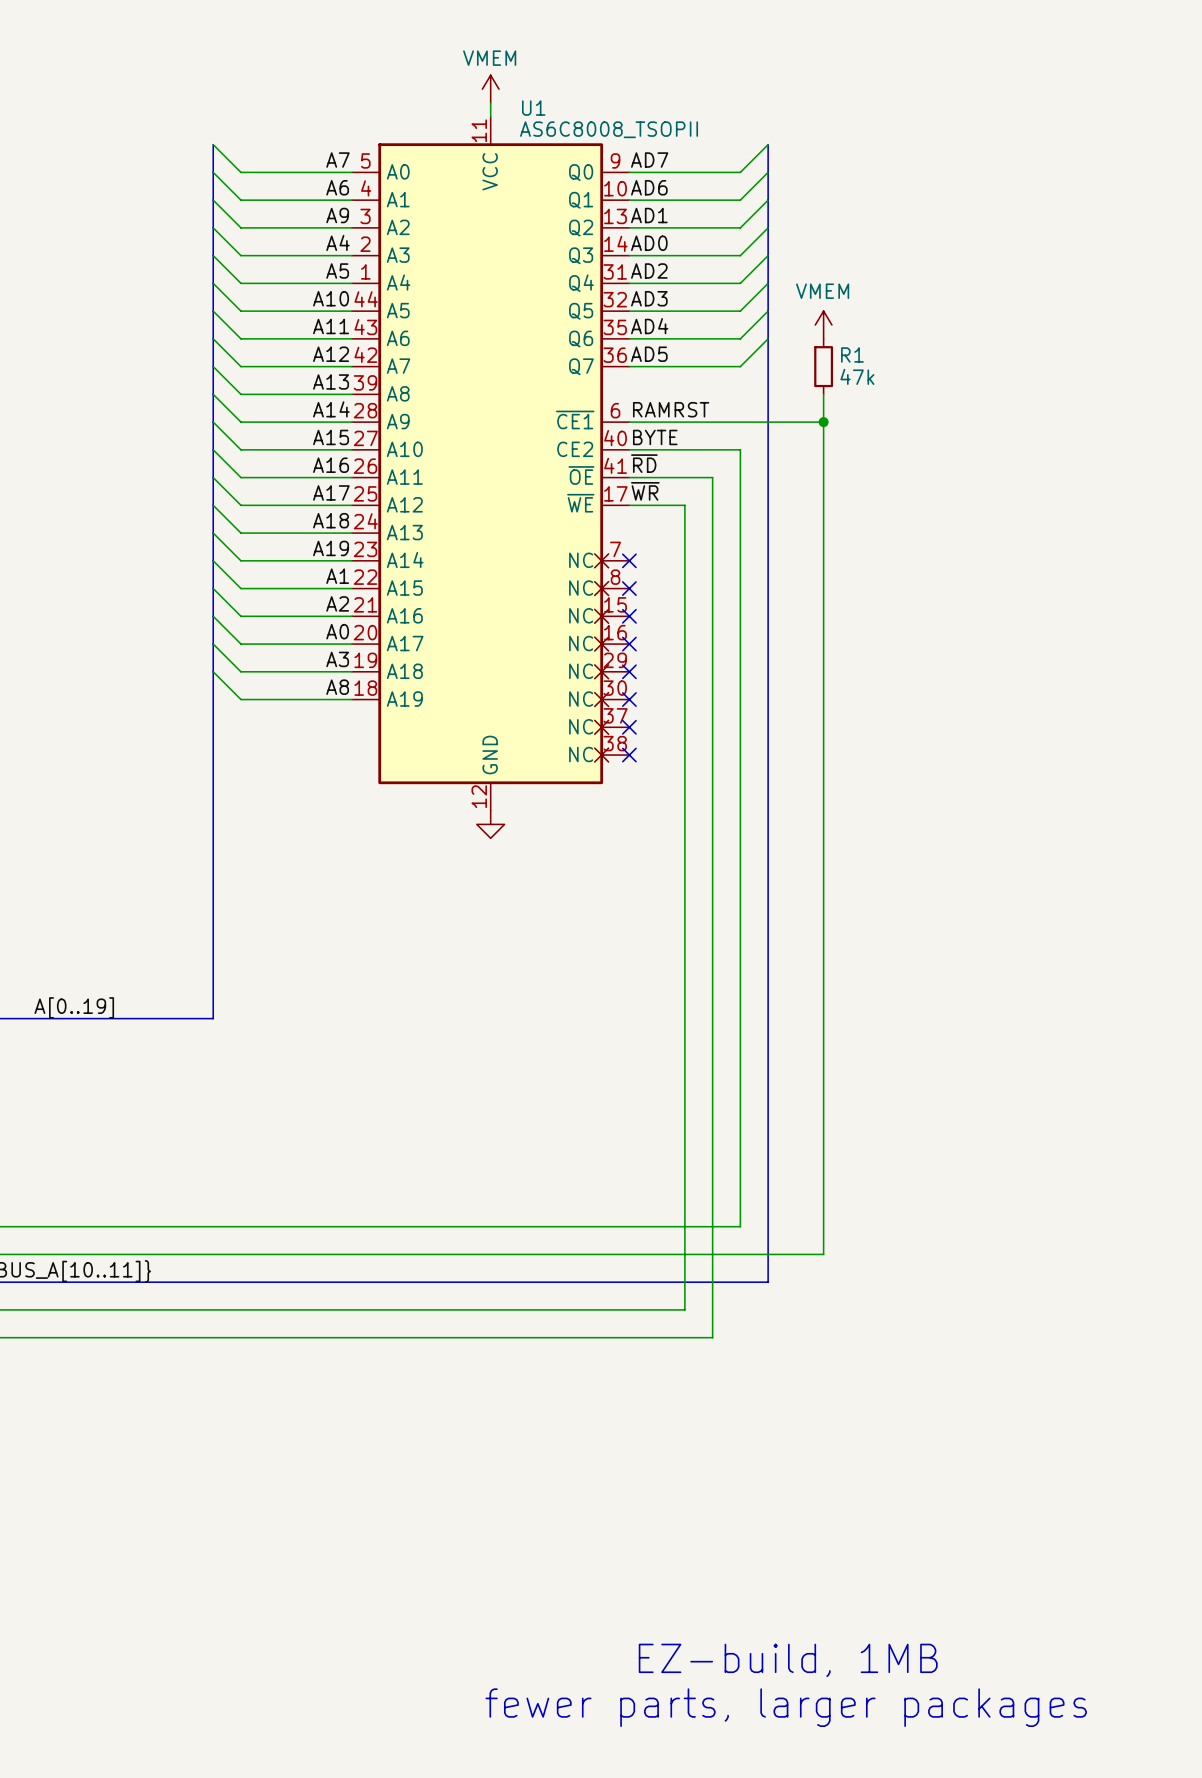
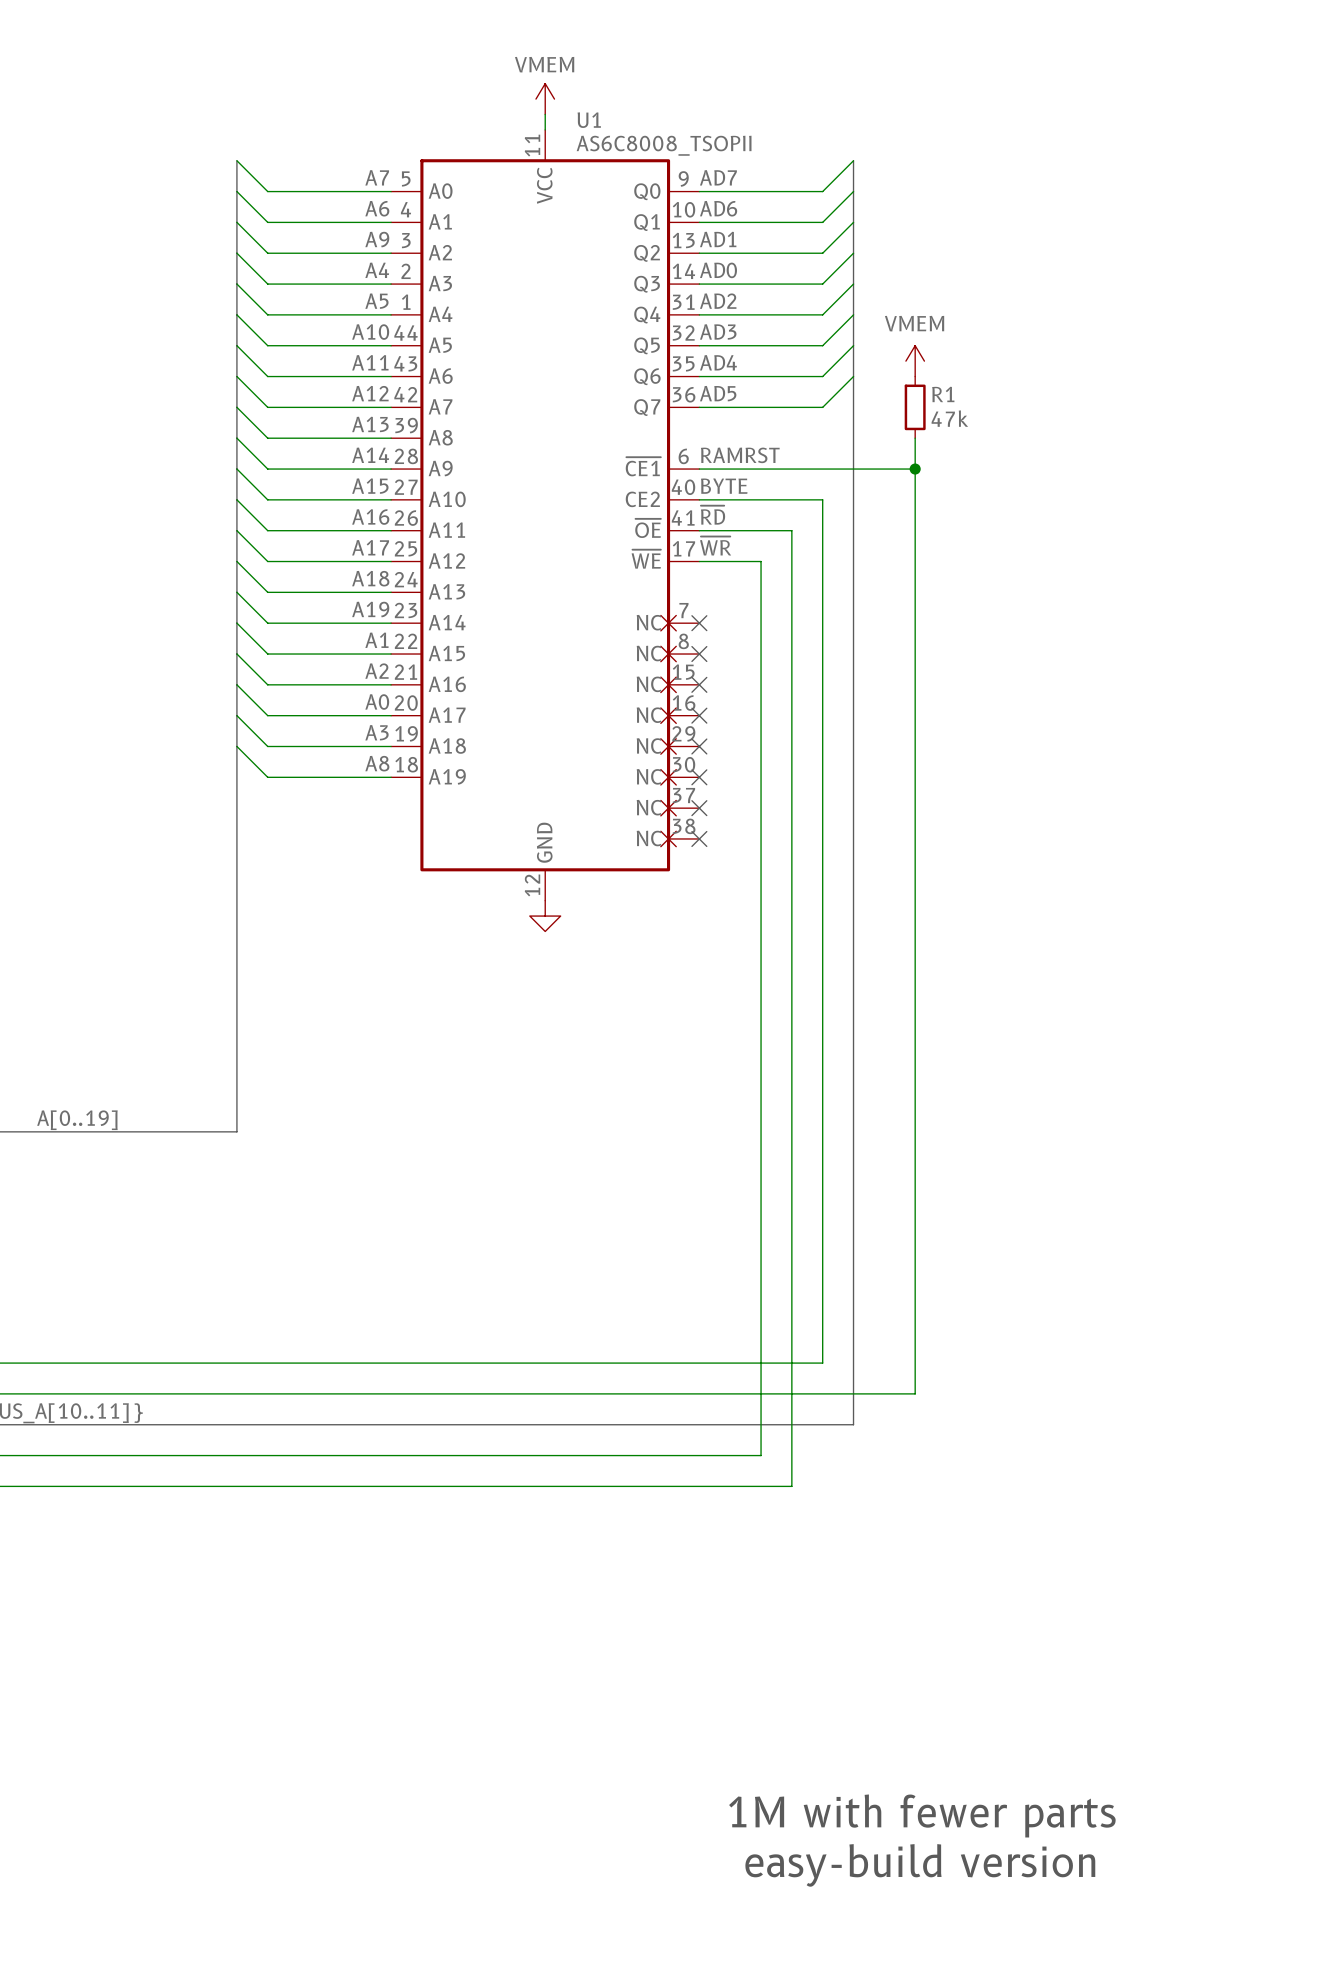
text: none -> 1M with fewer parts (922, 1815)
text: EZ-build, 1MB (788, 1660) -> none
text: none -> easy-build version (920, 1865)
text: fewer parts, larger packages (786, 1707) -> none

